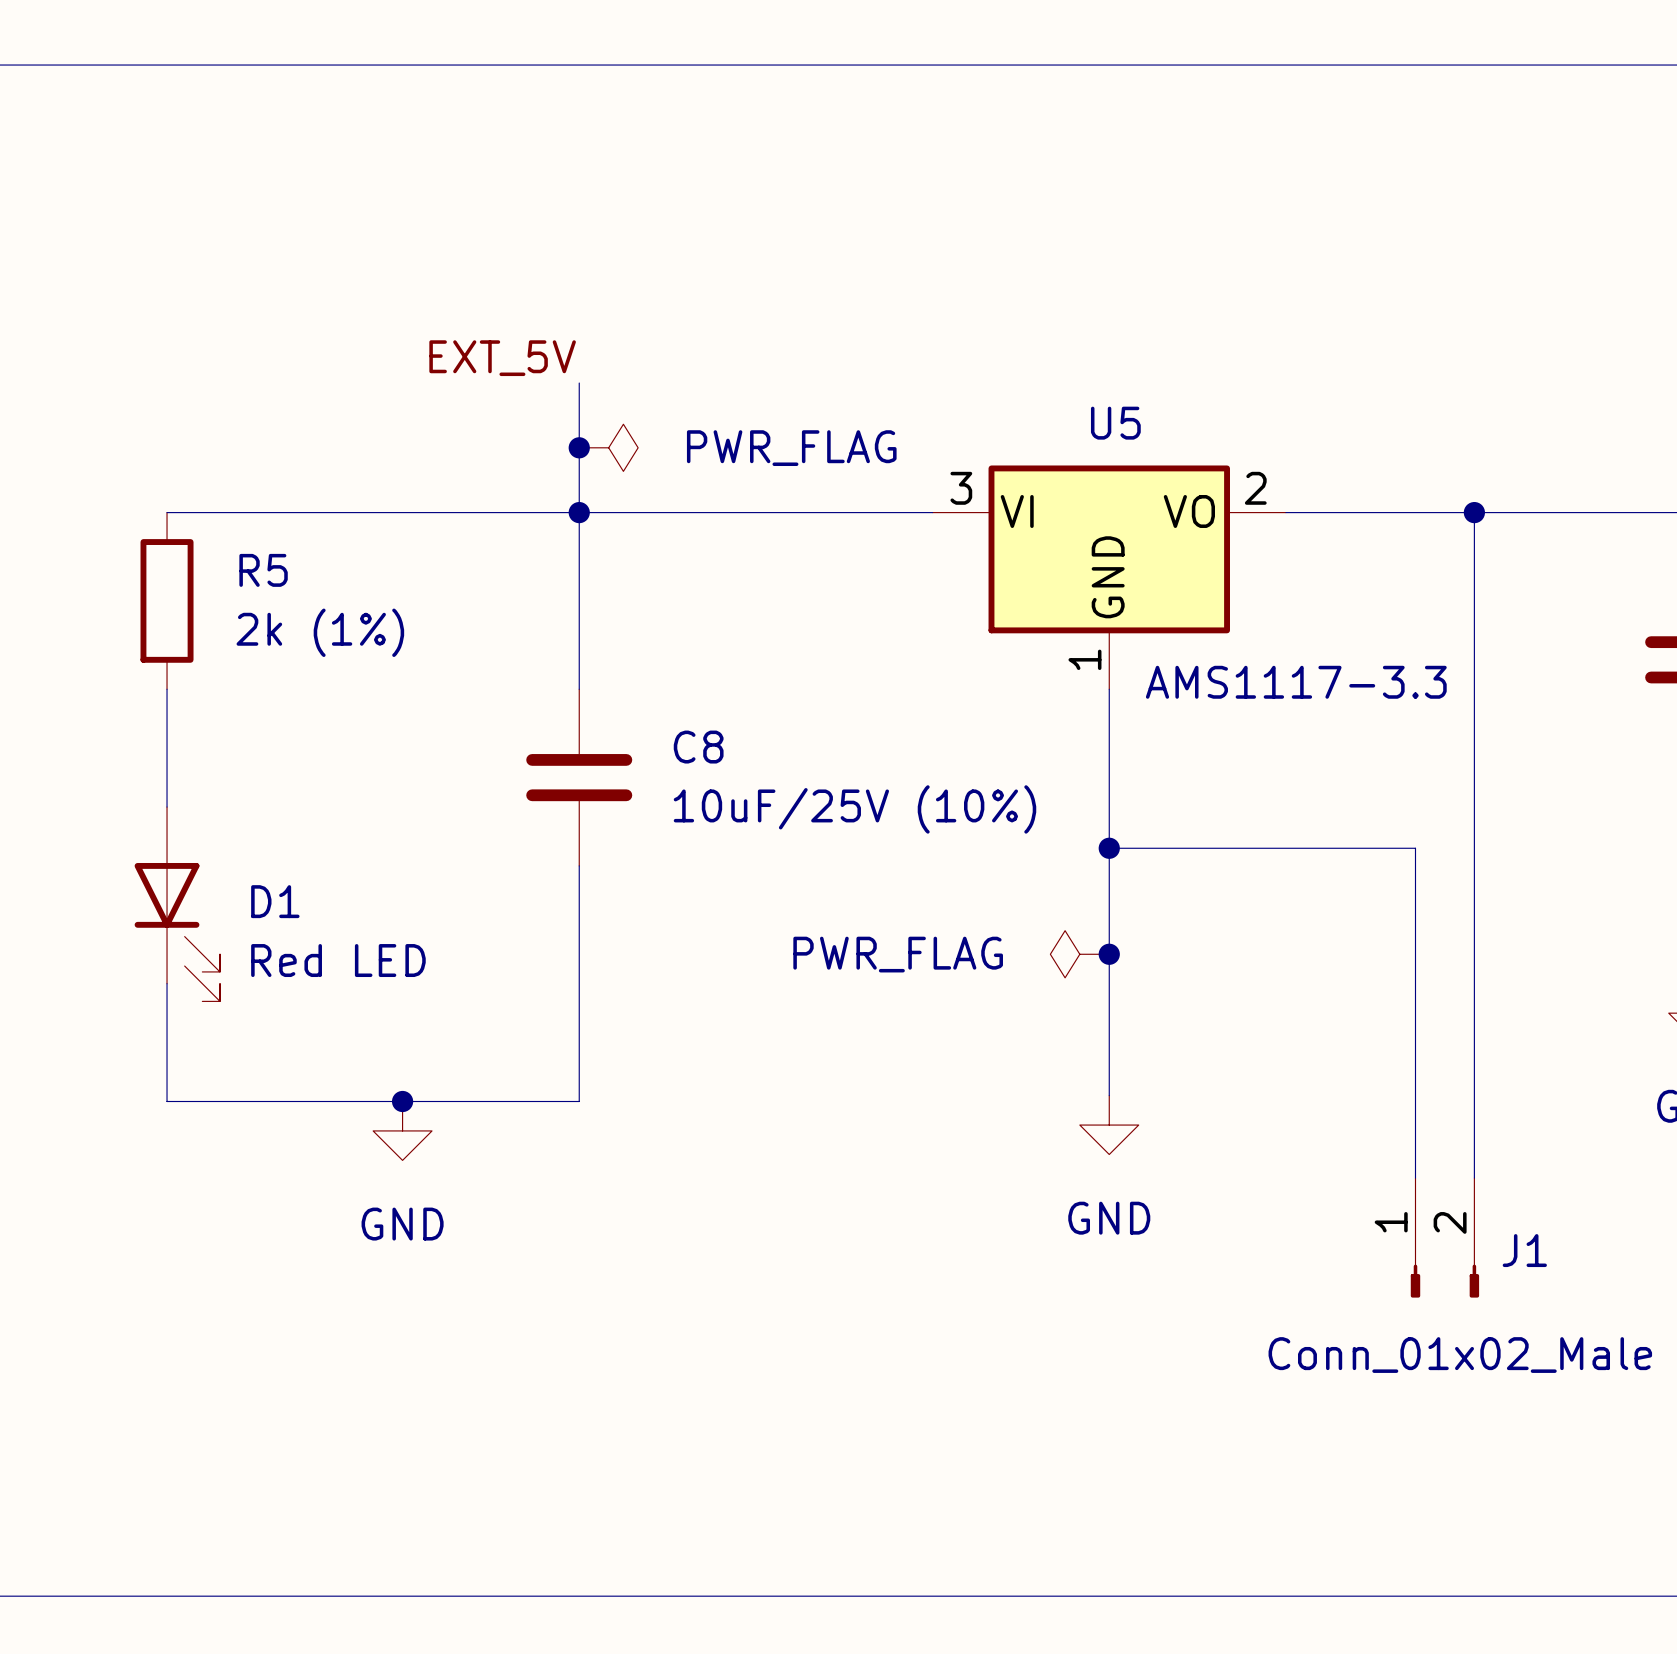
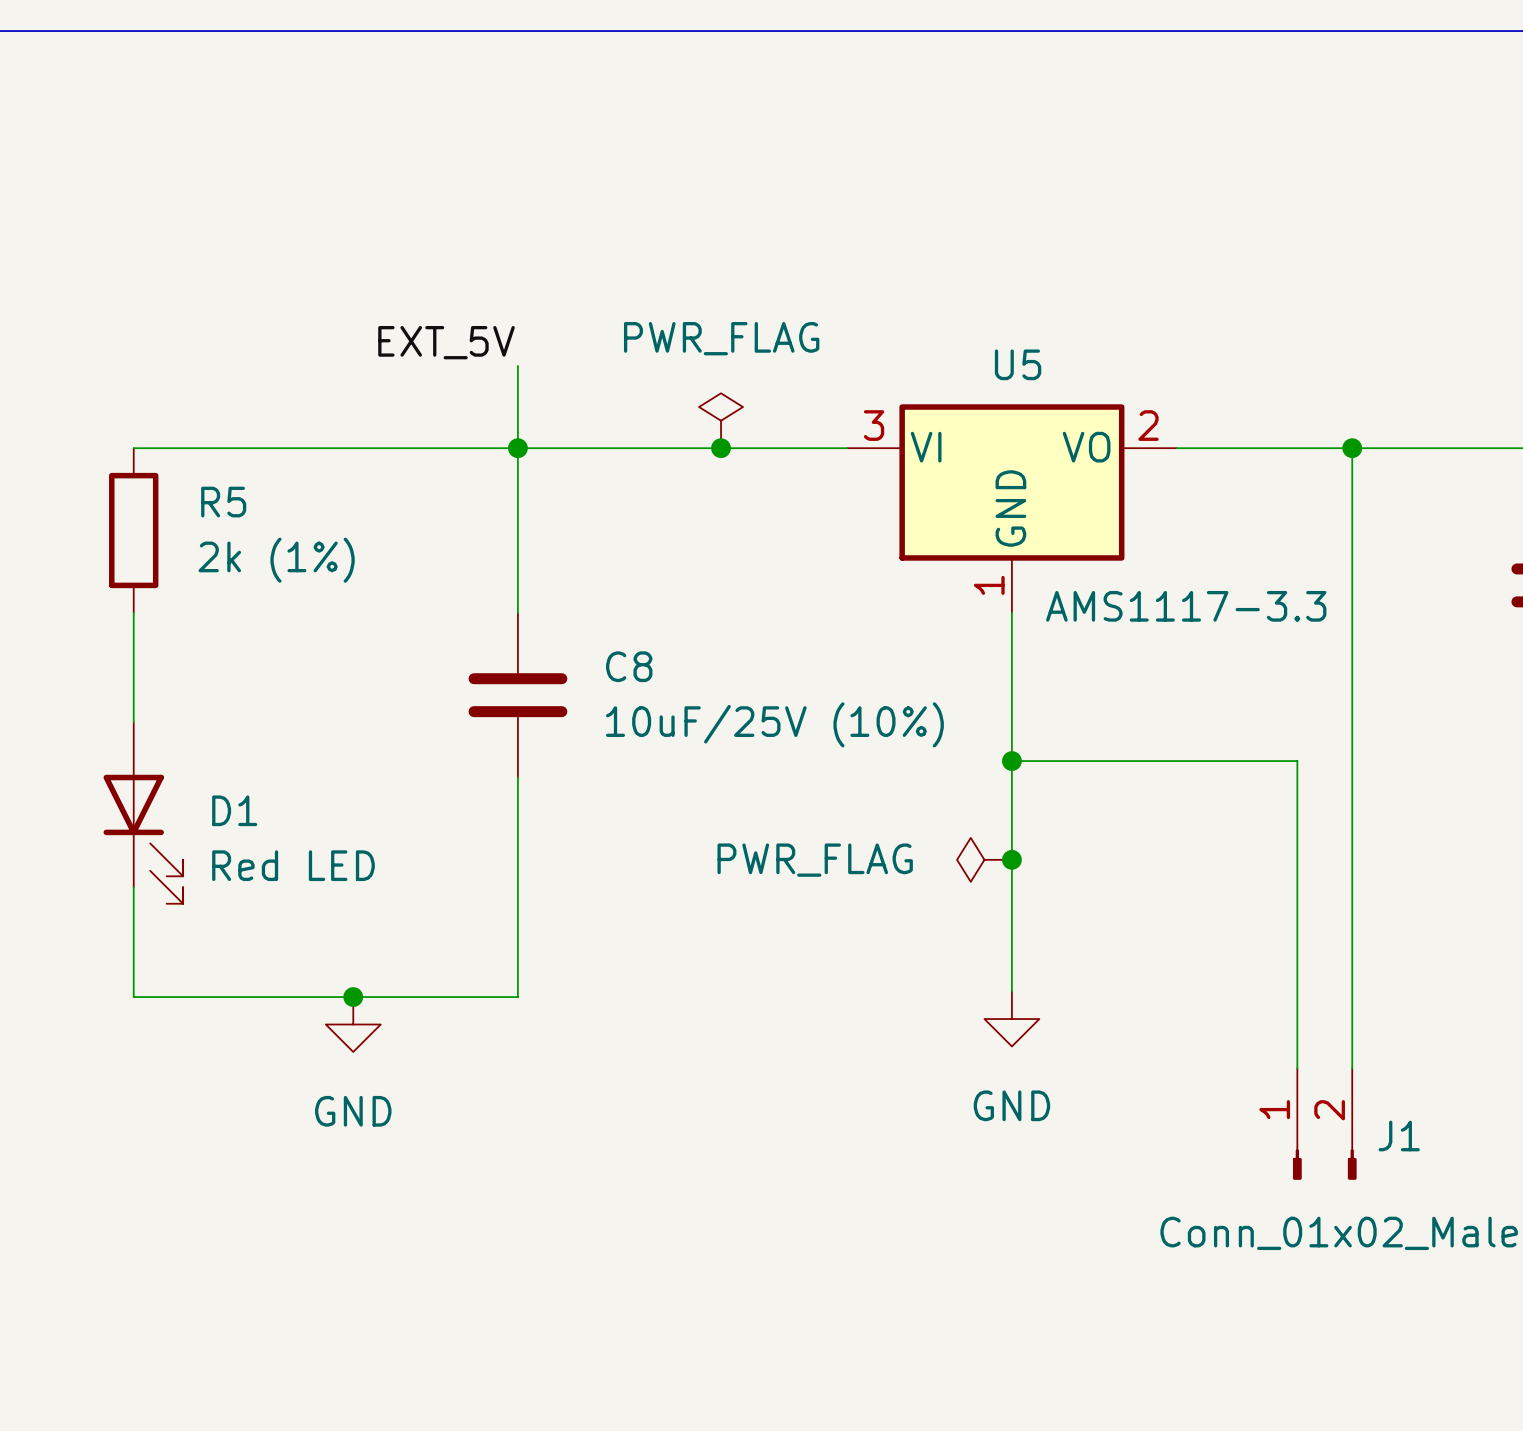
label position: EXT_5V (502, 358) -> EXT_5V (446, 342)
wire: (579, 383) (579, 424) -> none
junction: (579, 447) -> none
power symbol rotation: 0° (608, 447) -> 90° counterclockwise (721, 420)
power symbol position: PWR_FLAG (608, 447) -> PWR_FLAG (721, 420)
power symbol text position: PWR_FLAG (791, 448) -> PWR_FLAG (721, 338)
junction: none -> (721, 448)

